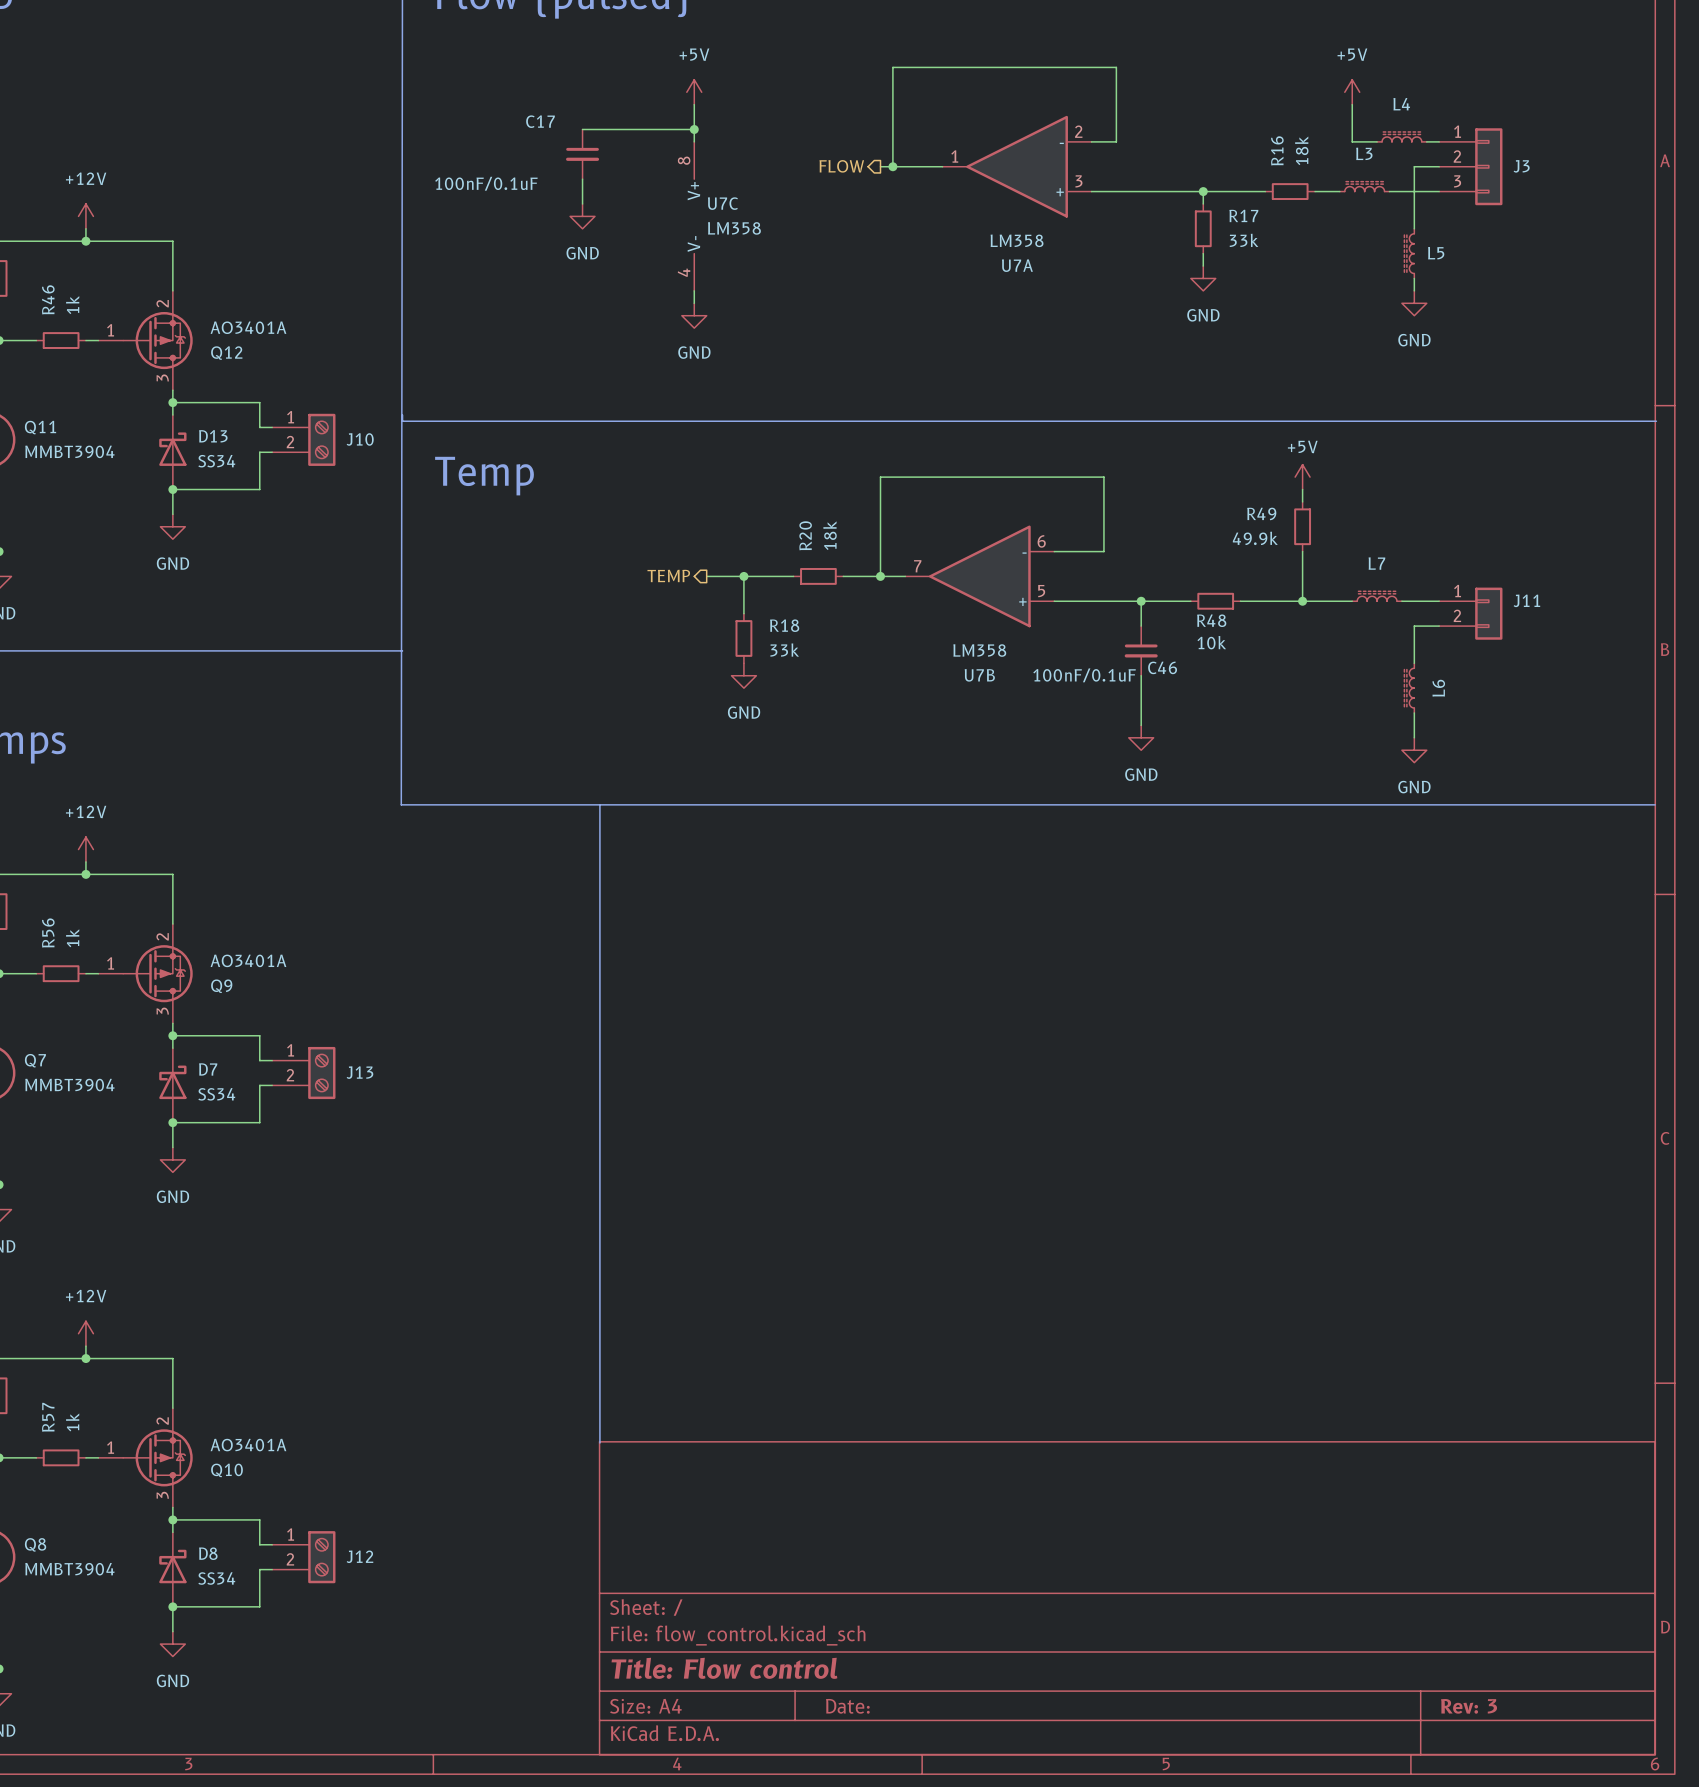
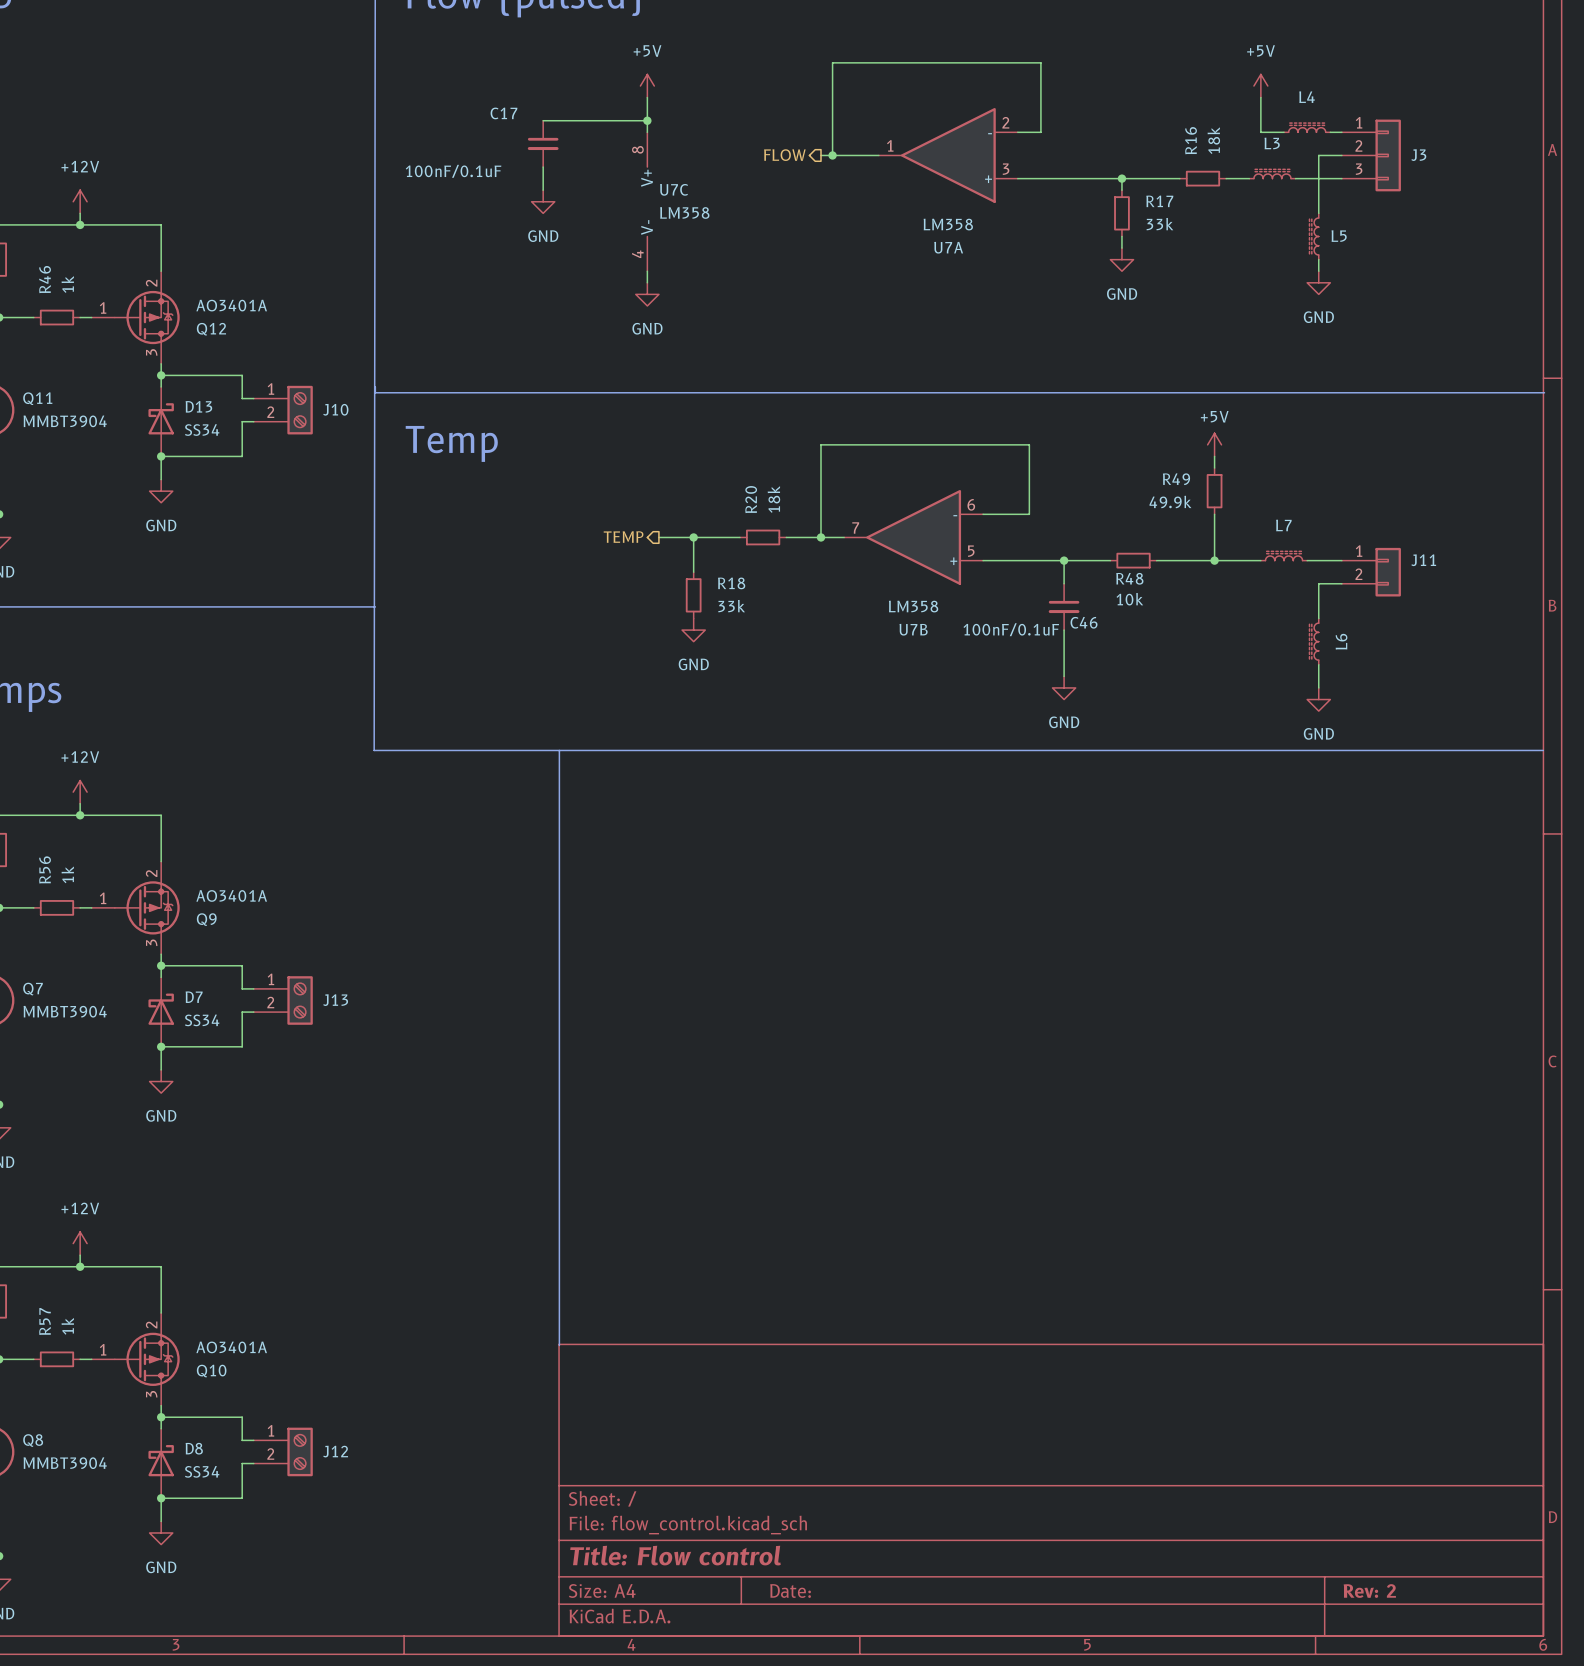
title block: Rev: 3 (1469, 1706) -> Rev: 2 (1369, 1591)

